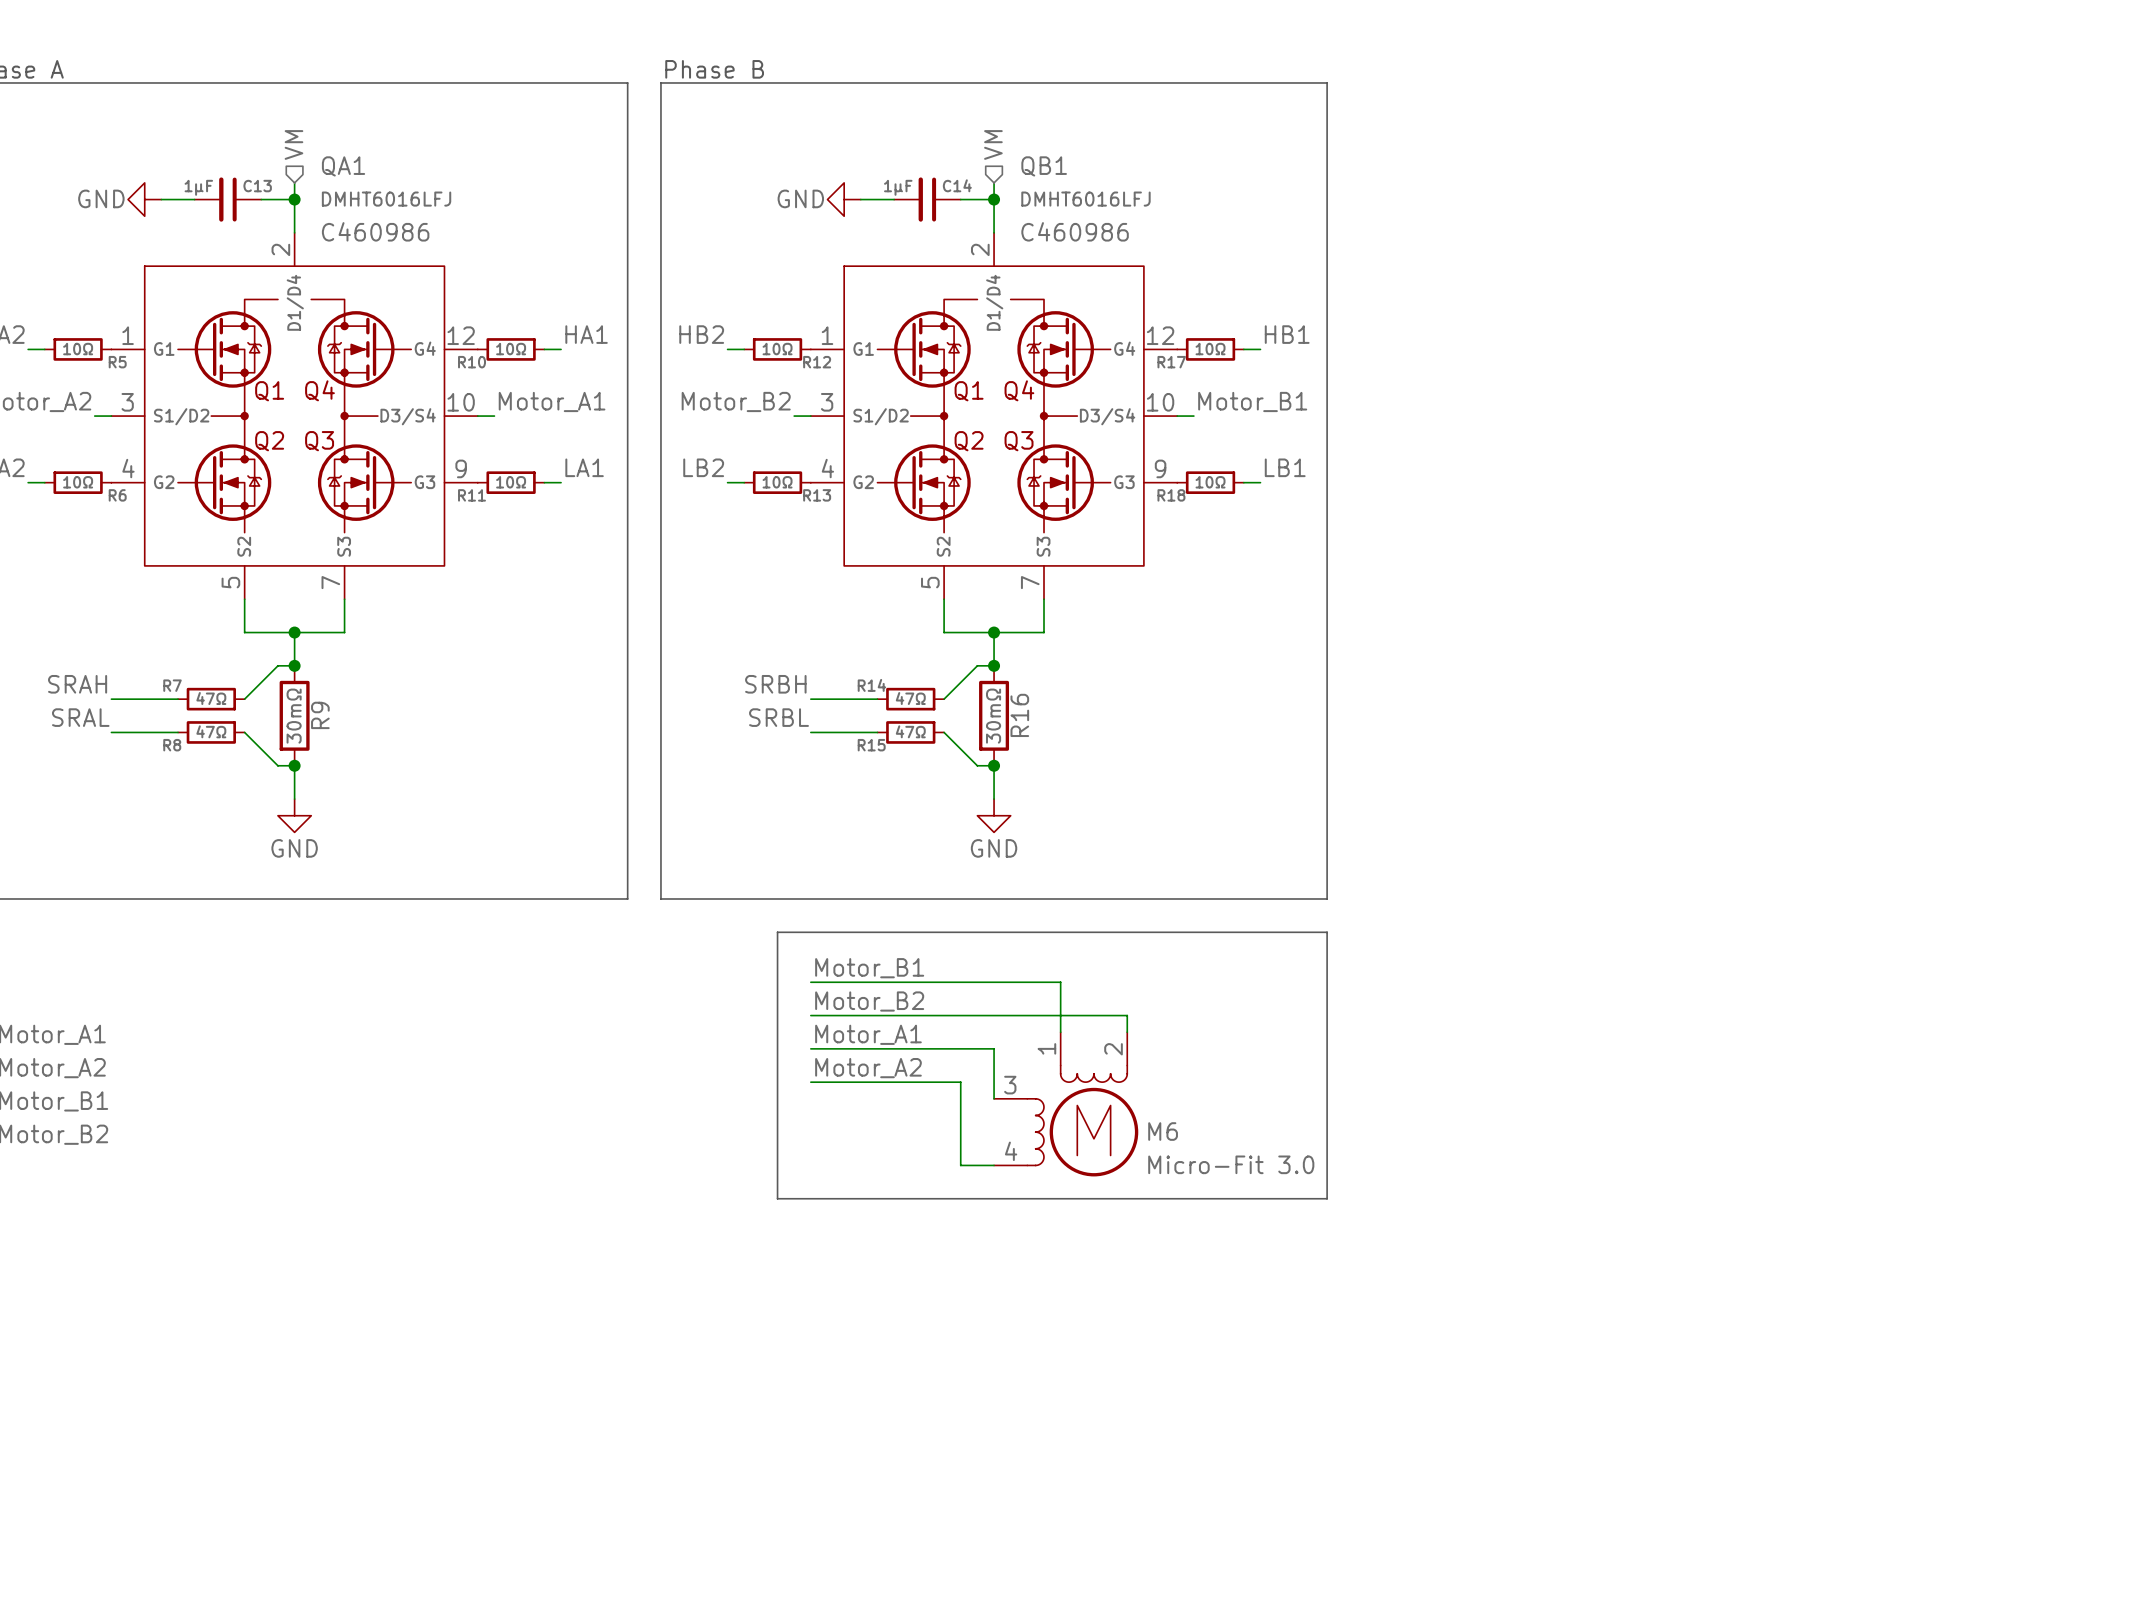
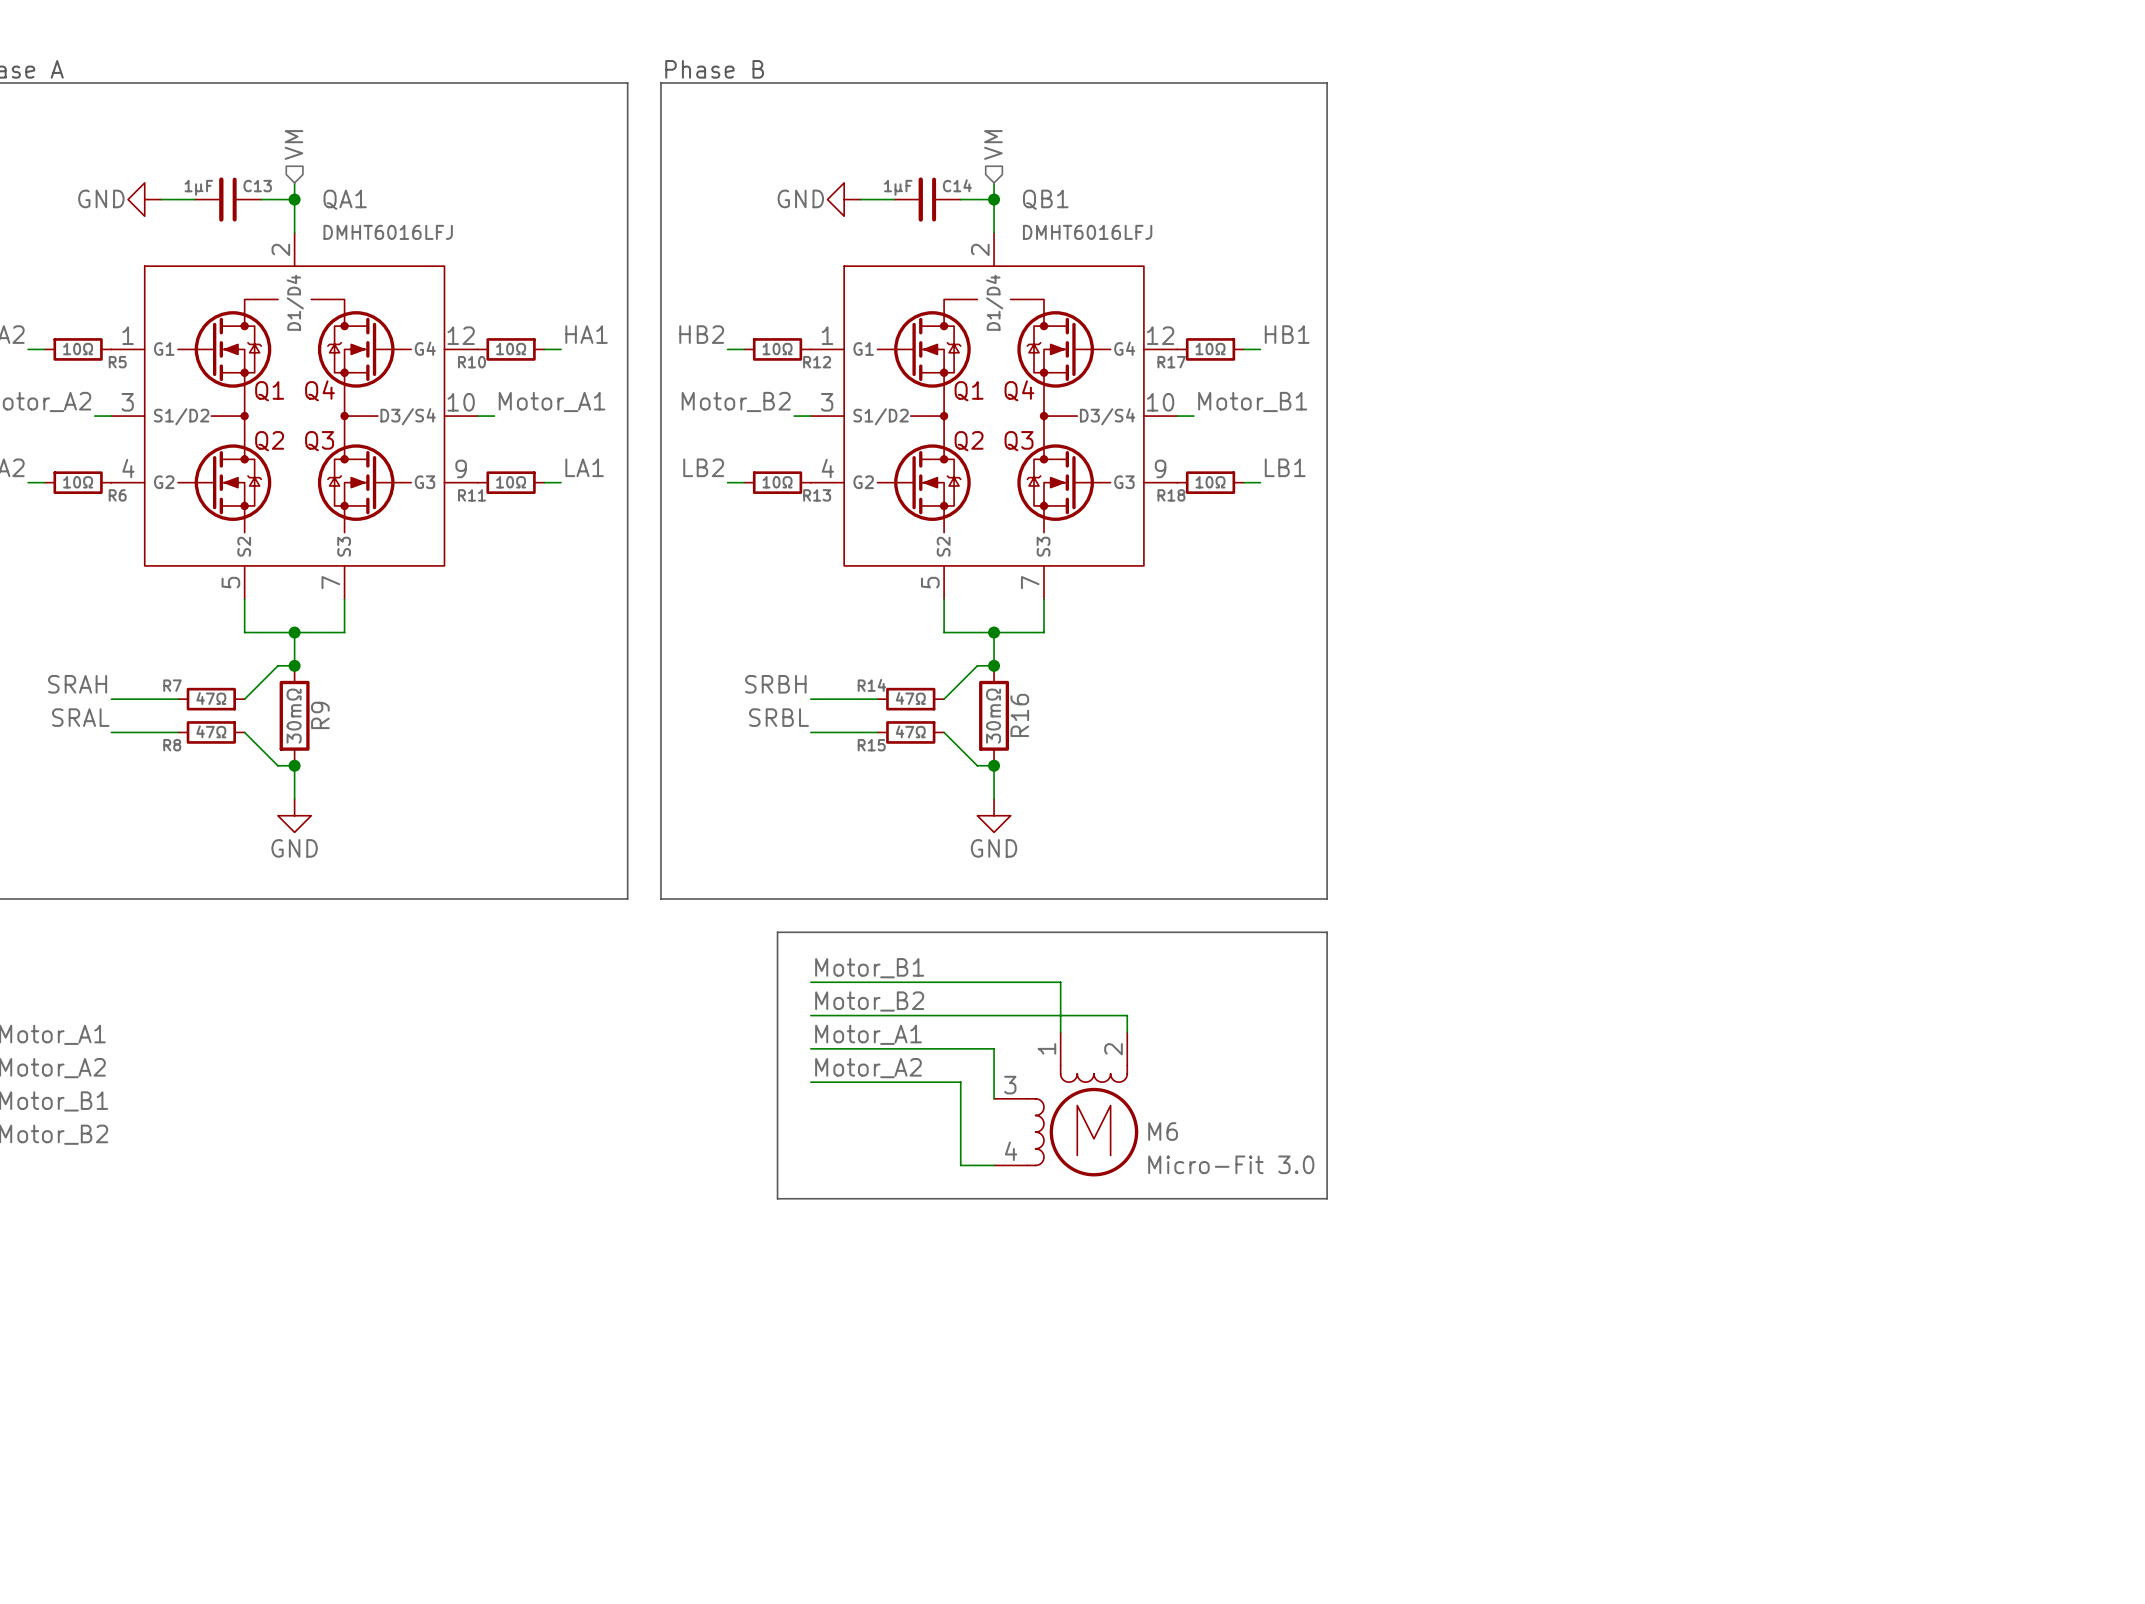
QA1 name position: QA1 (343, 166) -> QA1 (345, 199)
QB1 name position: QB1 (1044, 166) -> QB1 (1045, 199)
QA1 value position: DMHT6016LFJ (386, 199) -> DMHT6016LFJ (388, 232)
QB1 value position: DMHT6016LFJ (1085, 199) -> DMHT6016LFJ (1087, 232)
QA1 text: C460986 (375, 231) -> none
QB1 text: C460986 (1075, 231) -> none

